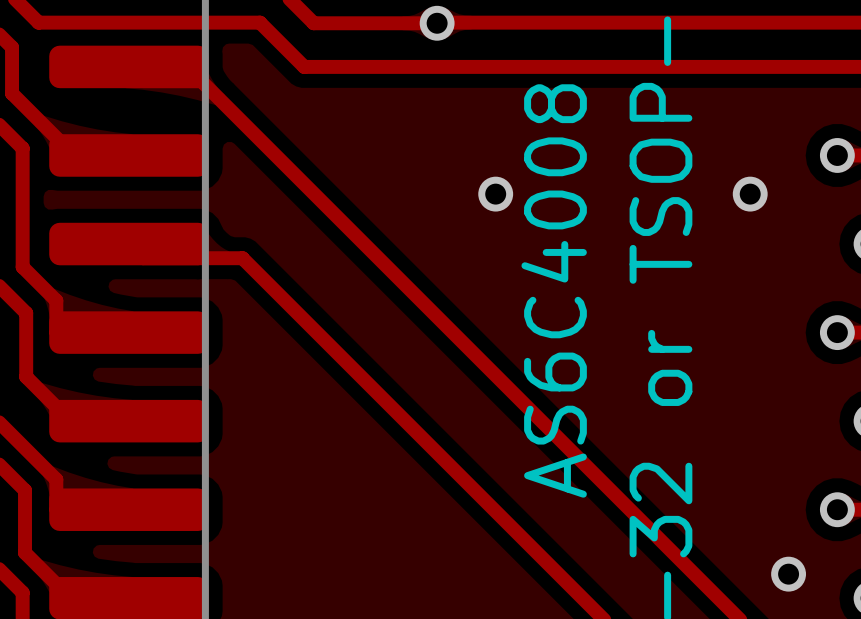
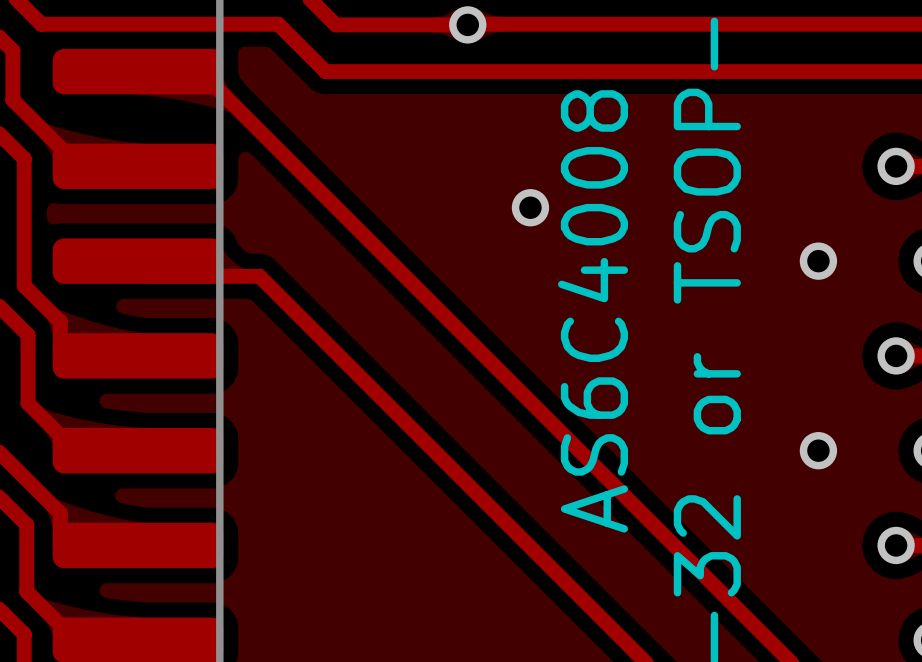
via position: (750, 194) -> (818, 261)
via: none -> (818, 450)
via: (788, 574) -> none

